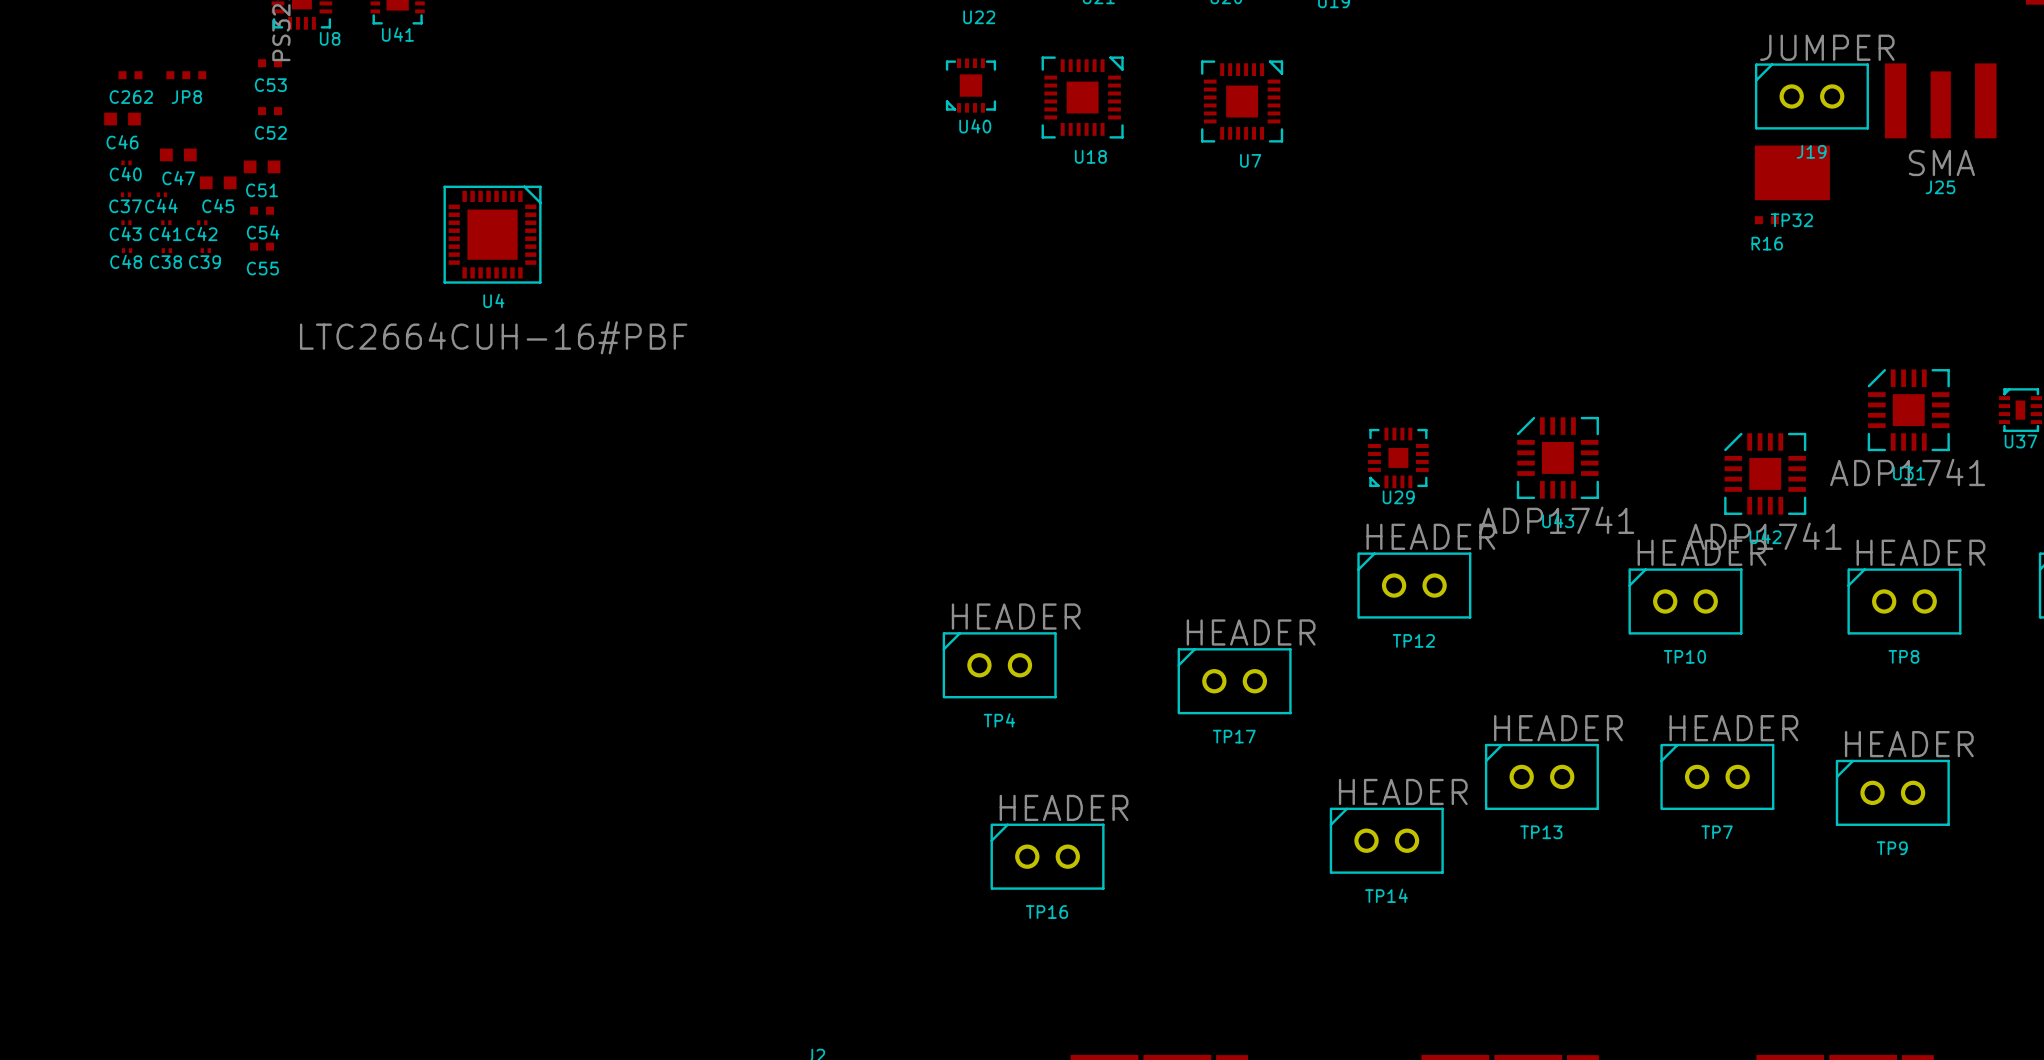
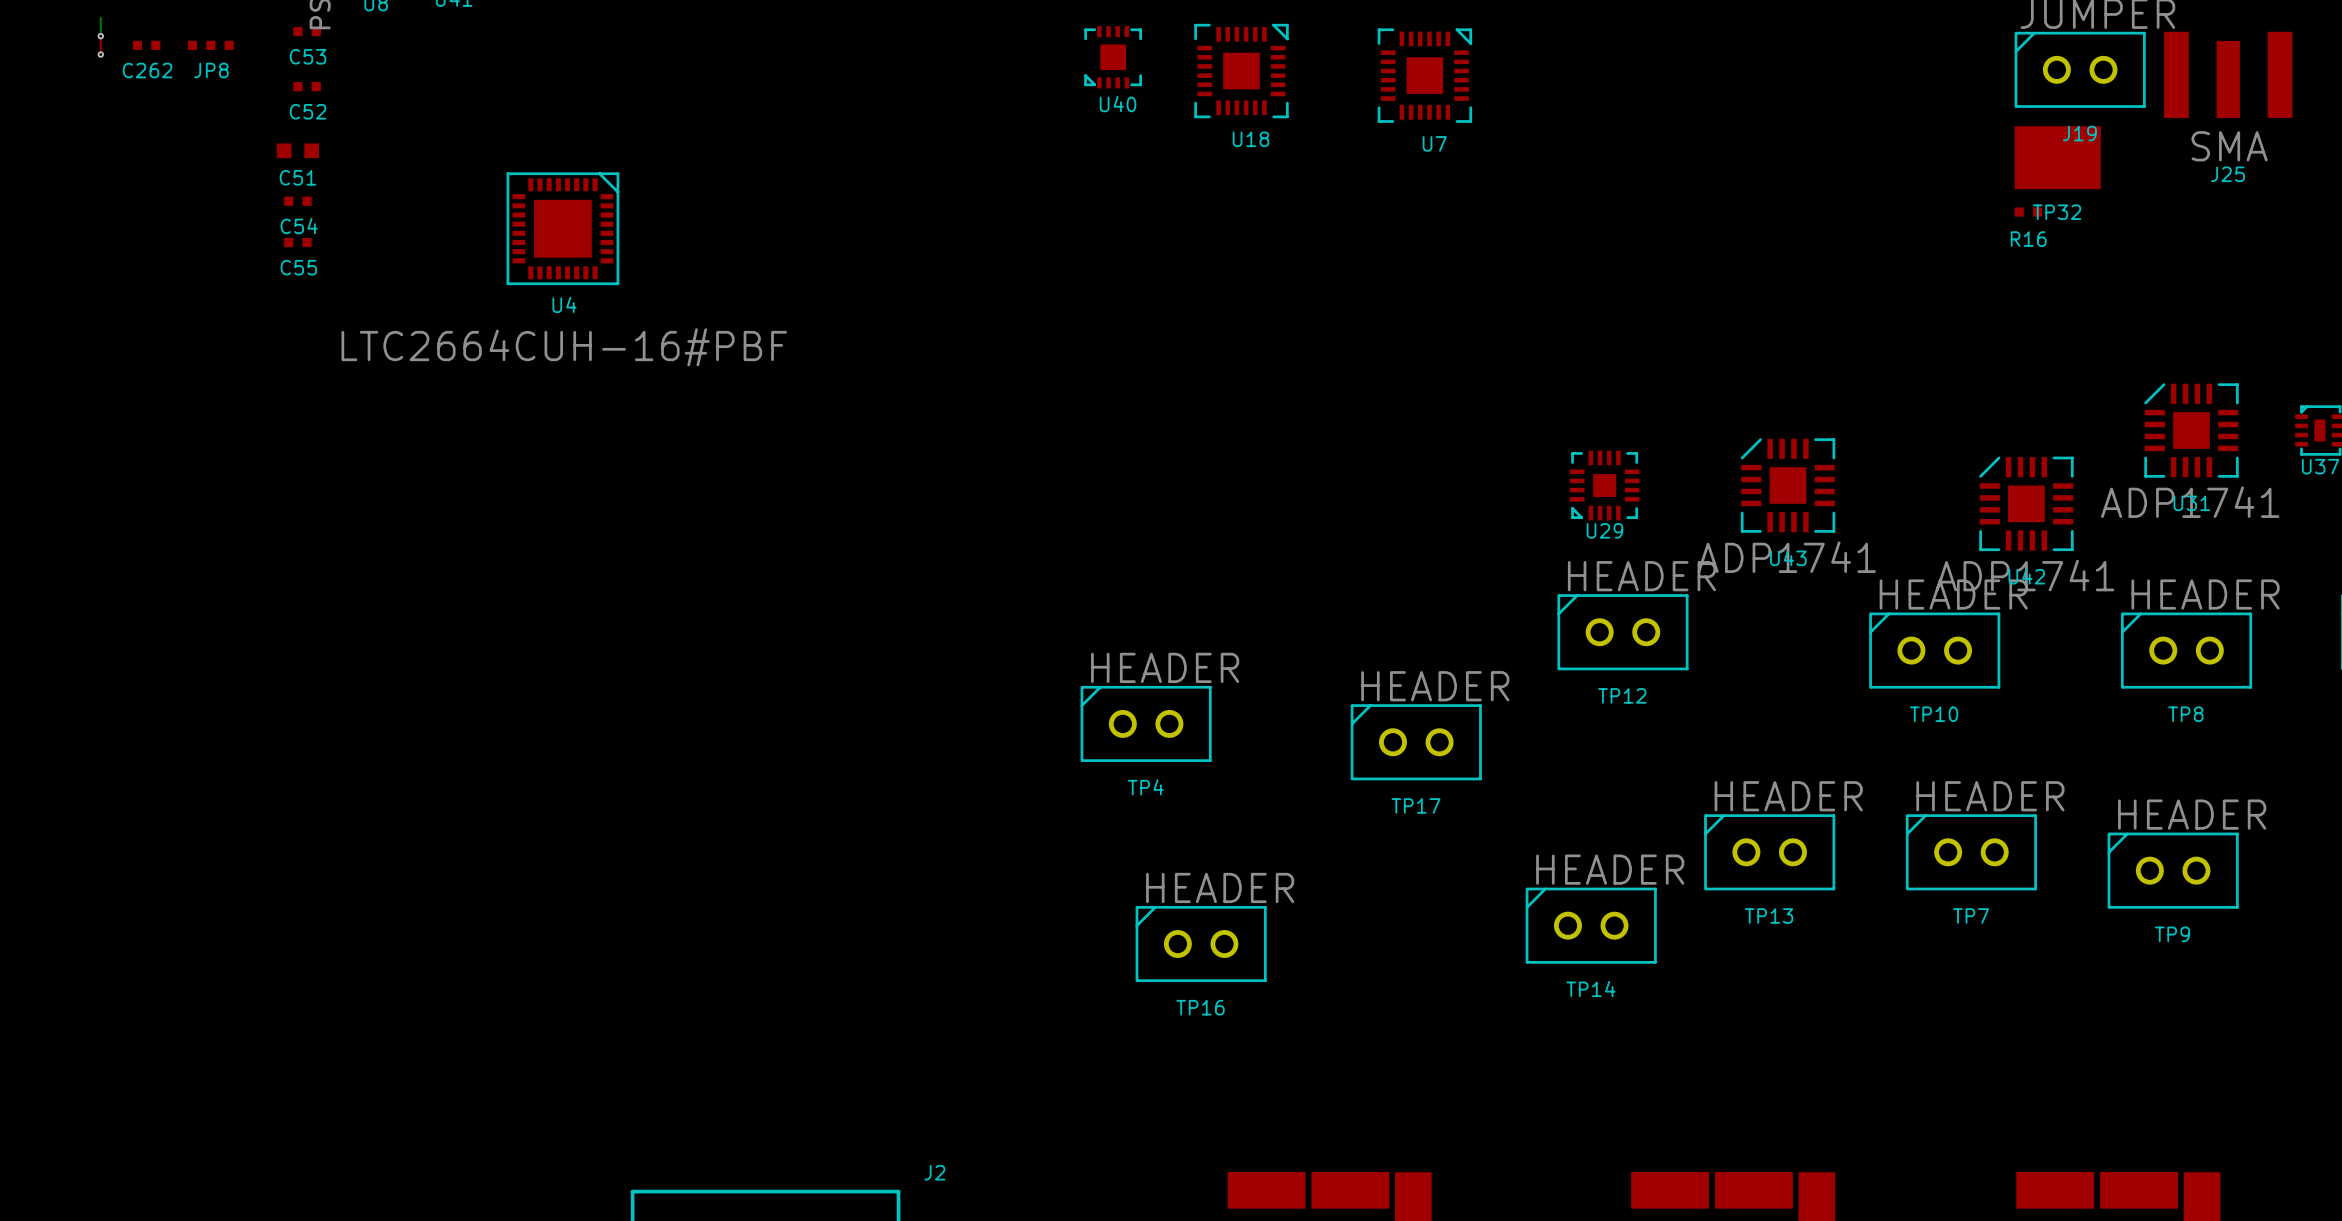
bottom track: none -> (100, 17) (100, 36)
top track: none -> (100, 36) (100, 54)
via: none -> (100, 36)
via: none -> (100, 54)
C46: (122, 119) -> none
C47: (178, 154) -> none
C40: (126, 162) -> none
C45: (218, 182) -> none
C37: (126, 194) -> none
C44: (161, 194) -> none
C43: (126, 222) -> none
C41: (166, 222) -> none
C42: (202, 222) -> none
C48: (126, 250) -> none
C38: (166, 250) -> none
C39: (205, 250) -> none

